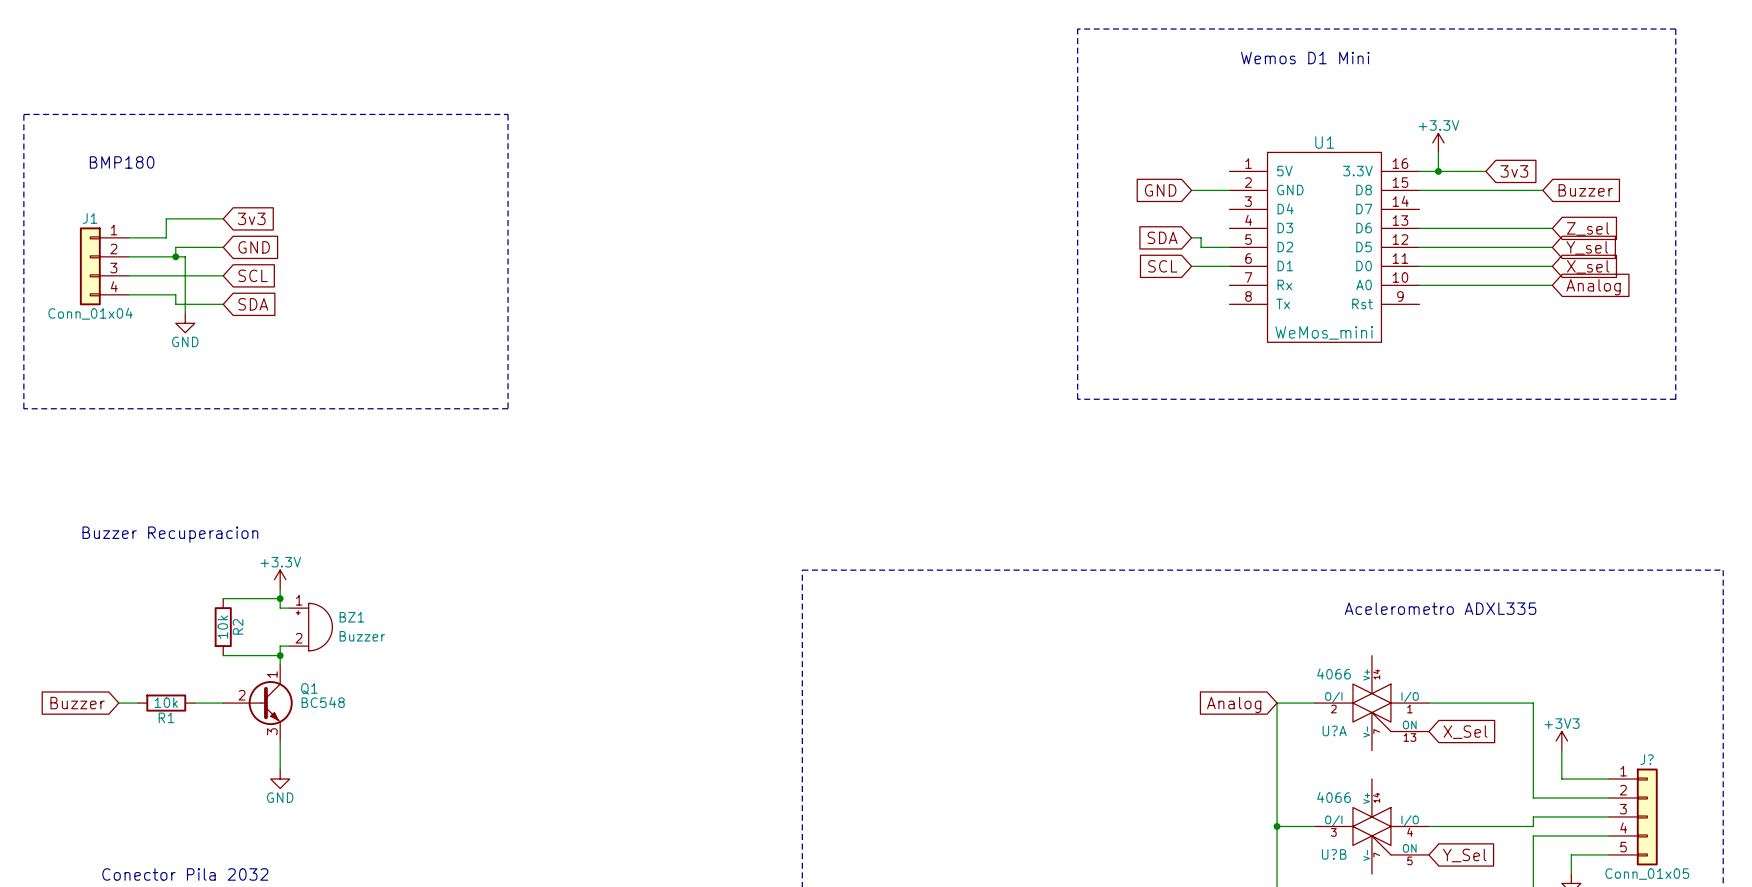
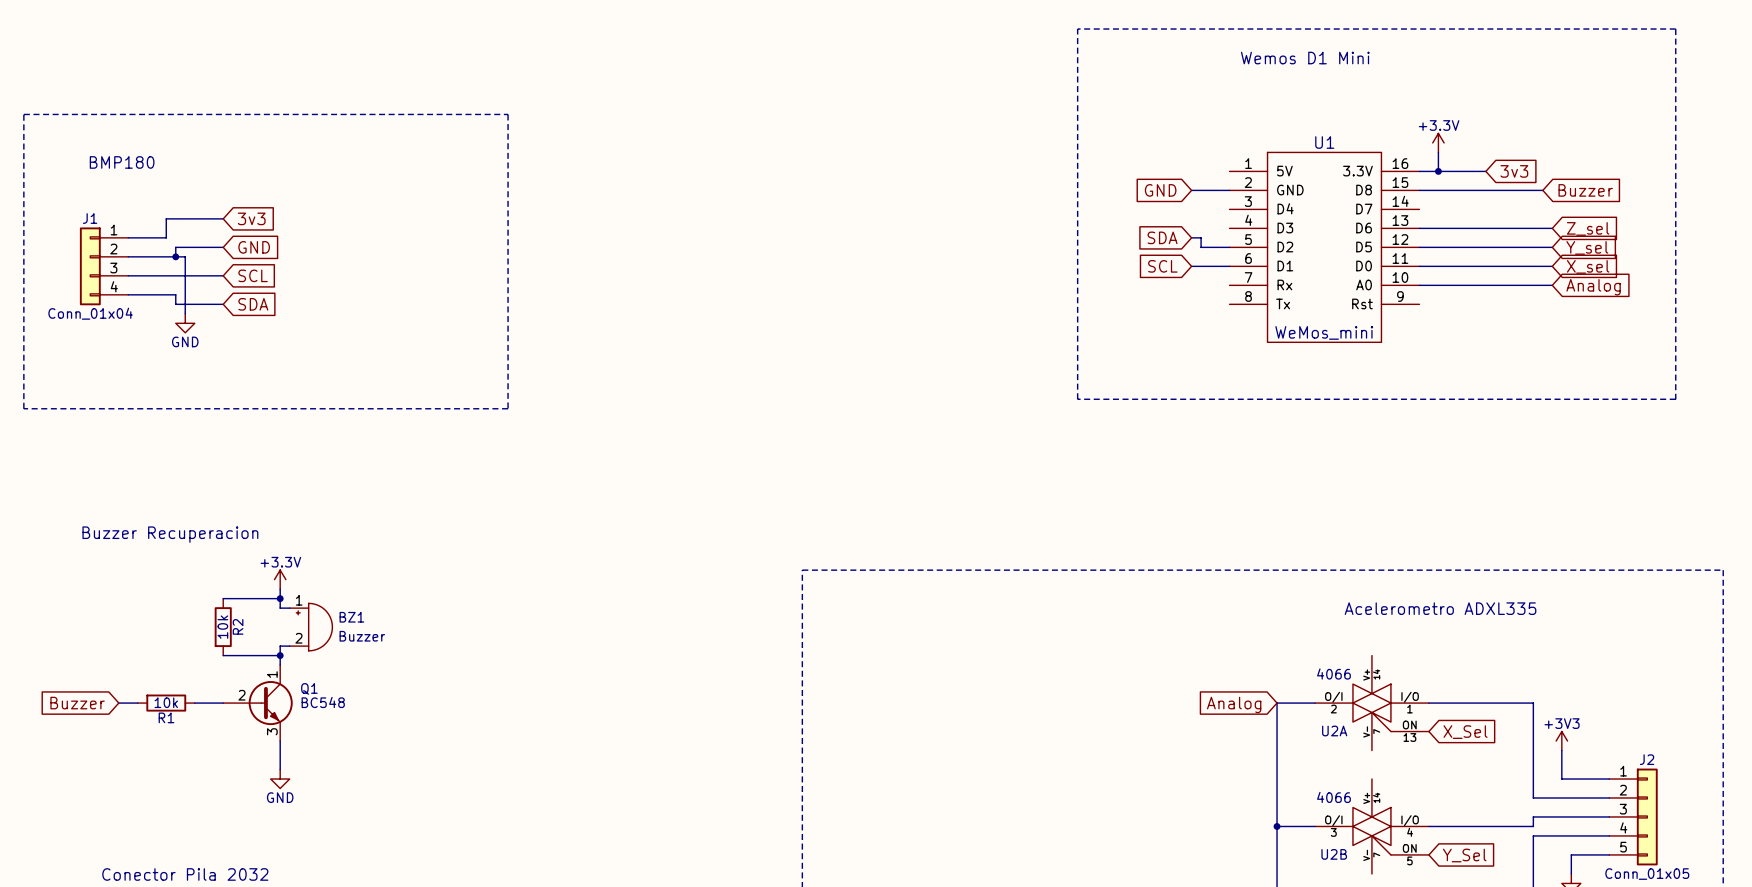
U?A name: U?A (1334, 730) -> U2A (1334, 730)
J? name: J? (1647, 759) -> J2 (1647, 759)
U?B name: U?B (1334, 854) -> U2B (1334, 854)

